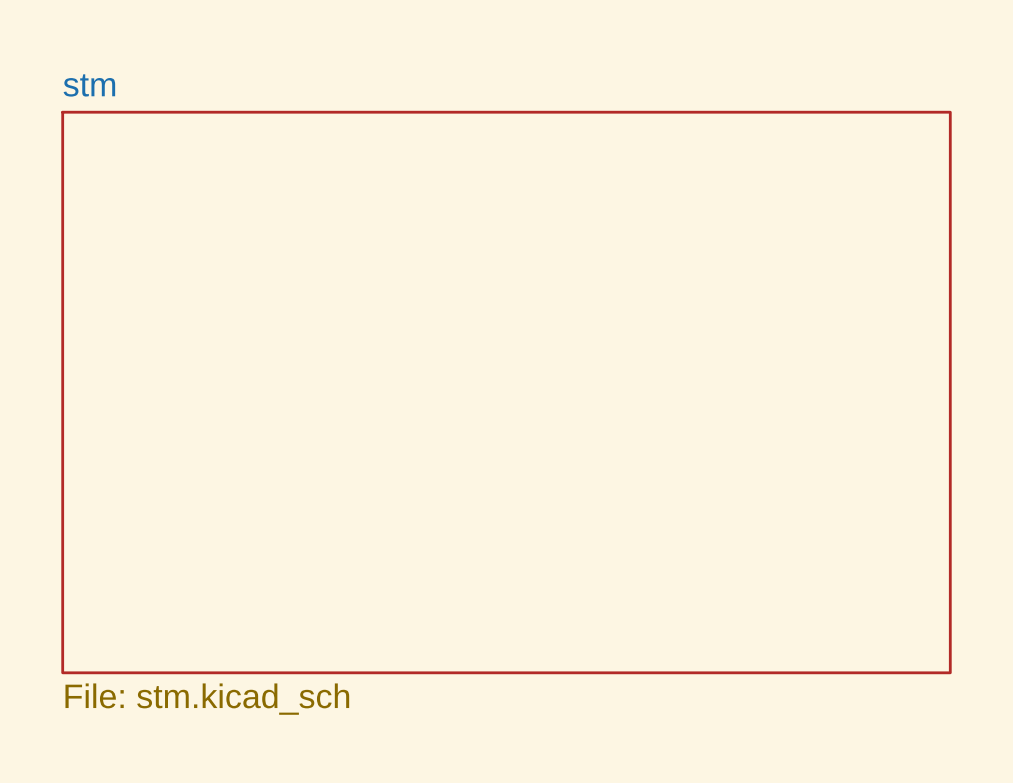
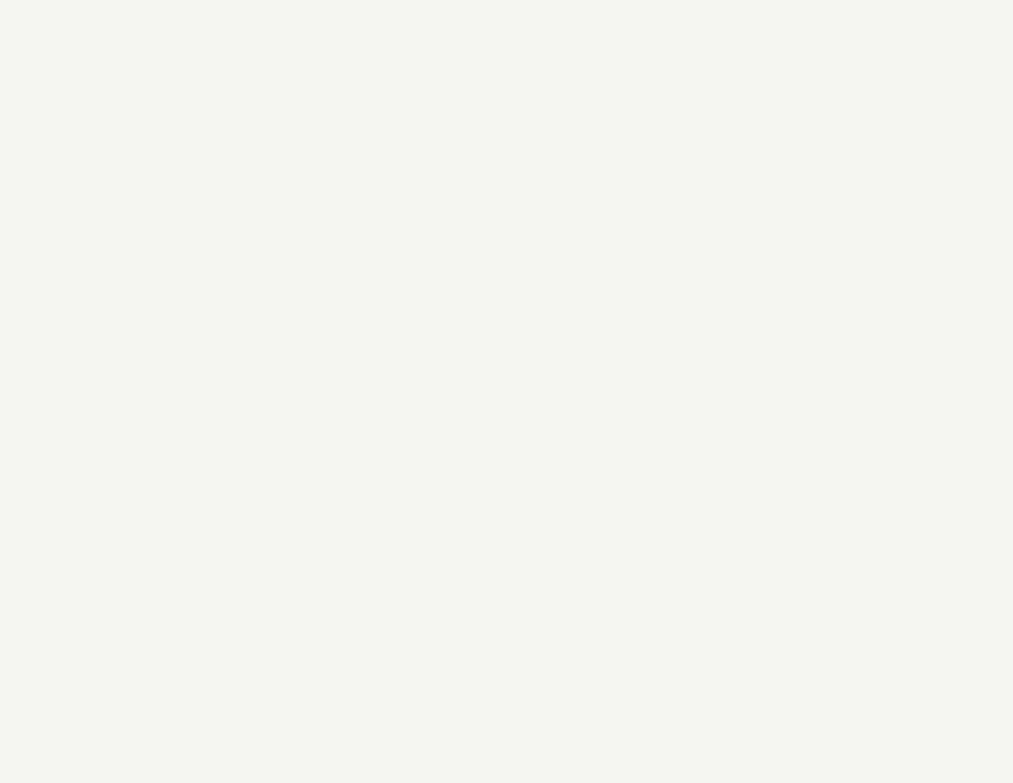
sheet stm: File: stm.kicad_sch (506, 392) -> none

